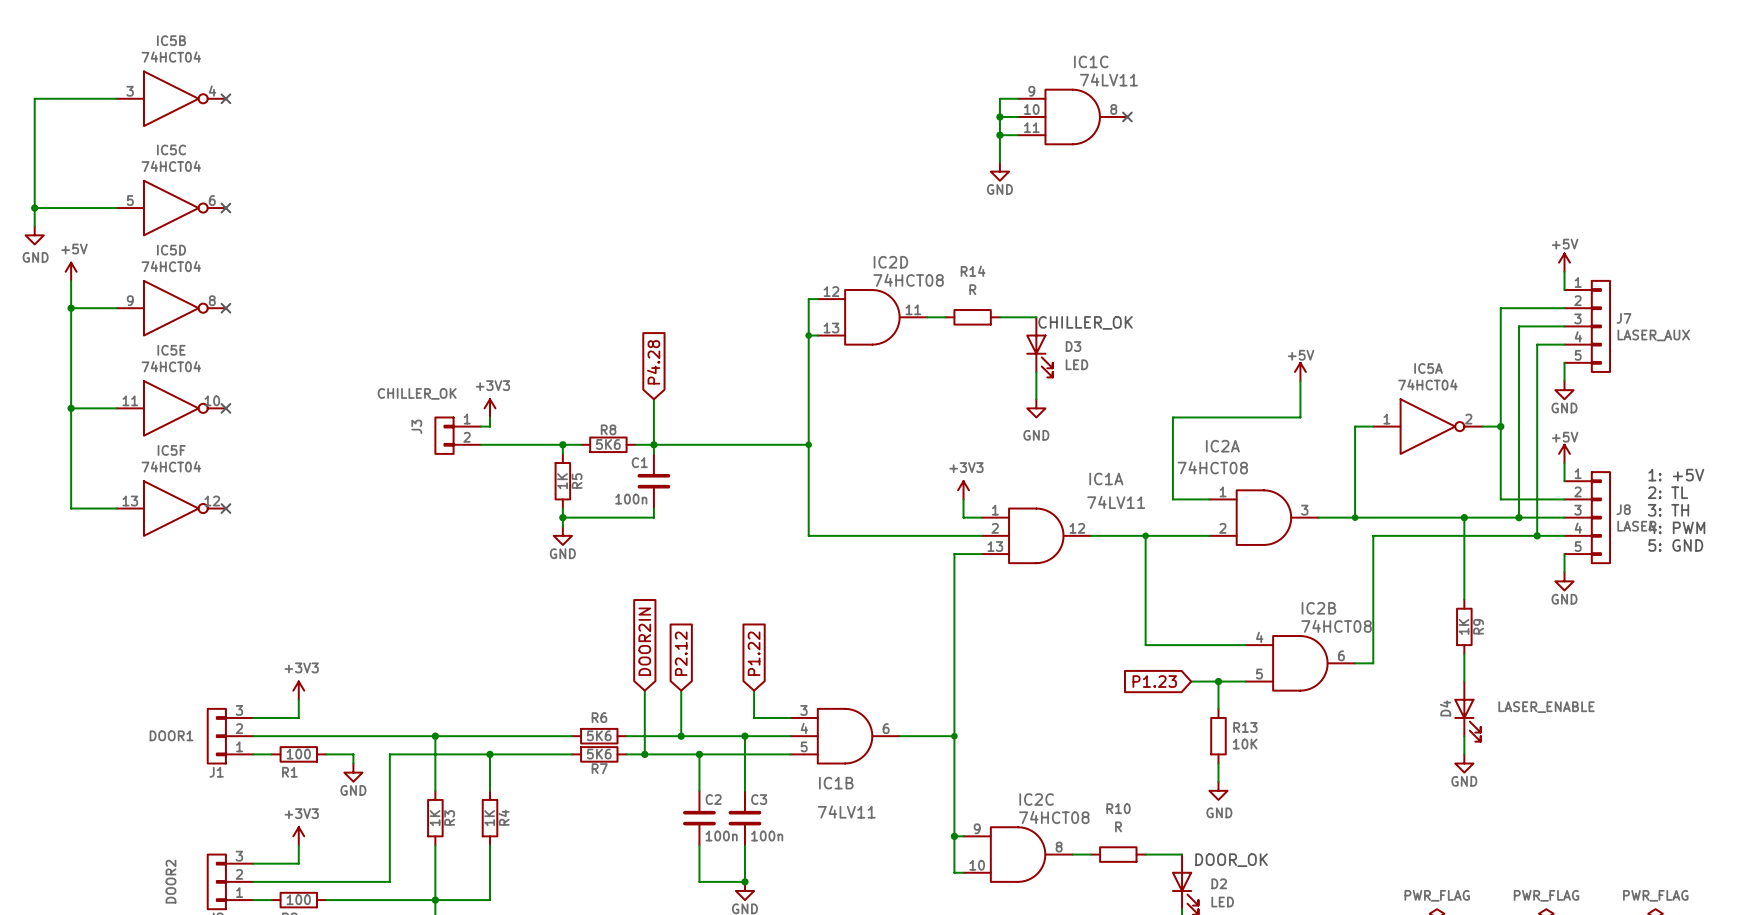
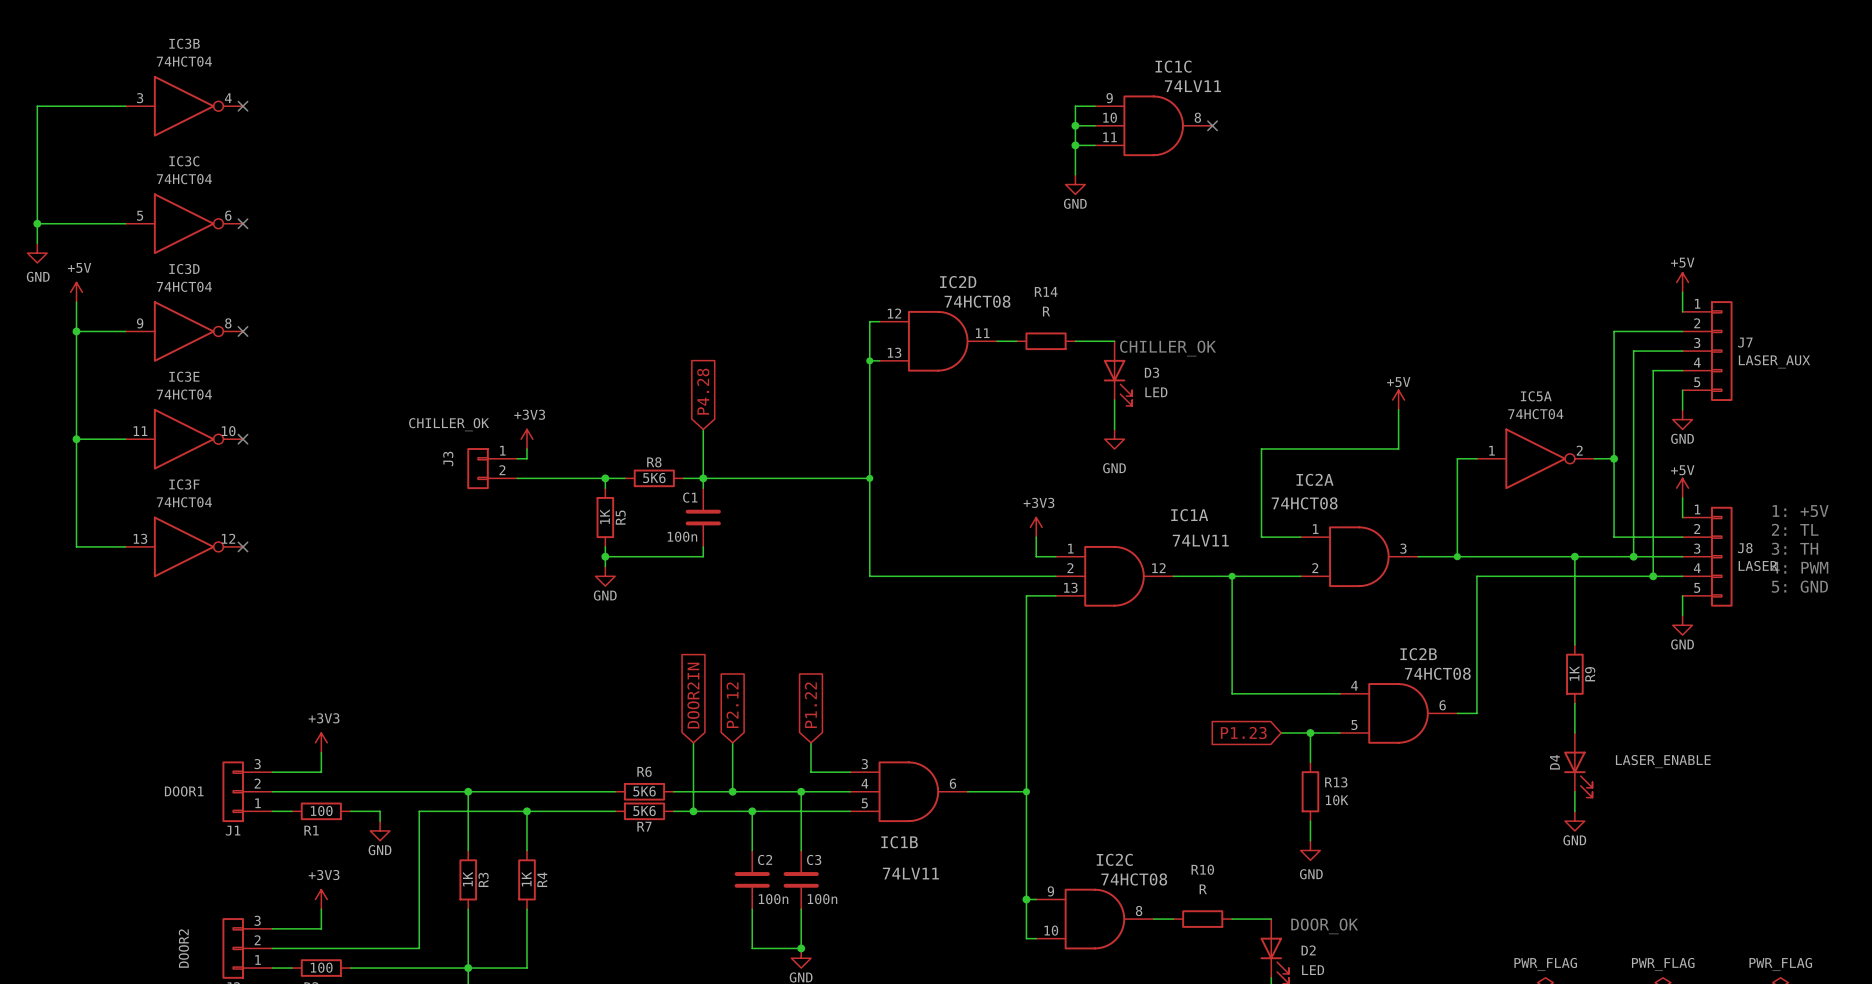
IC5B name: IC5B (171, 40) -> IC3B (184, 43)
IC5C name: IC5C (171, 149) -> IC3C (184, 161)
IC5D name: IC5D (171, 250) -> IC3D (184, 269)
IC5E name: IC5E (171, 350) -> IC3E (184, 376)
IC5F name: IC5F (171, 450) -> IC3F (184, 484)

